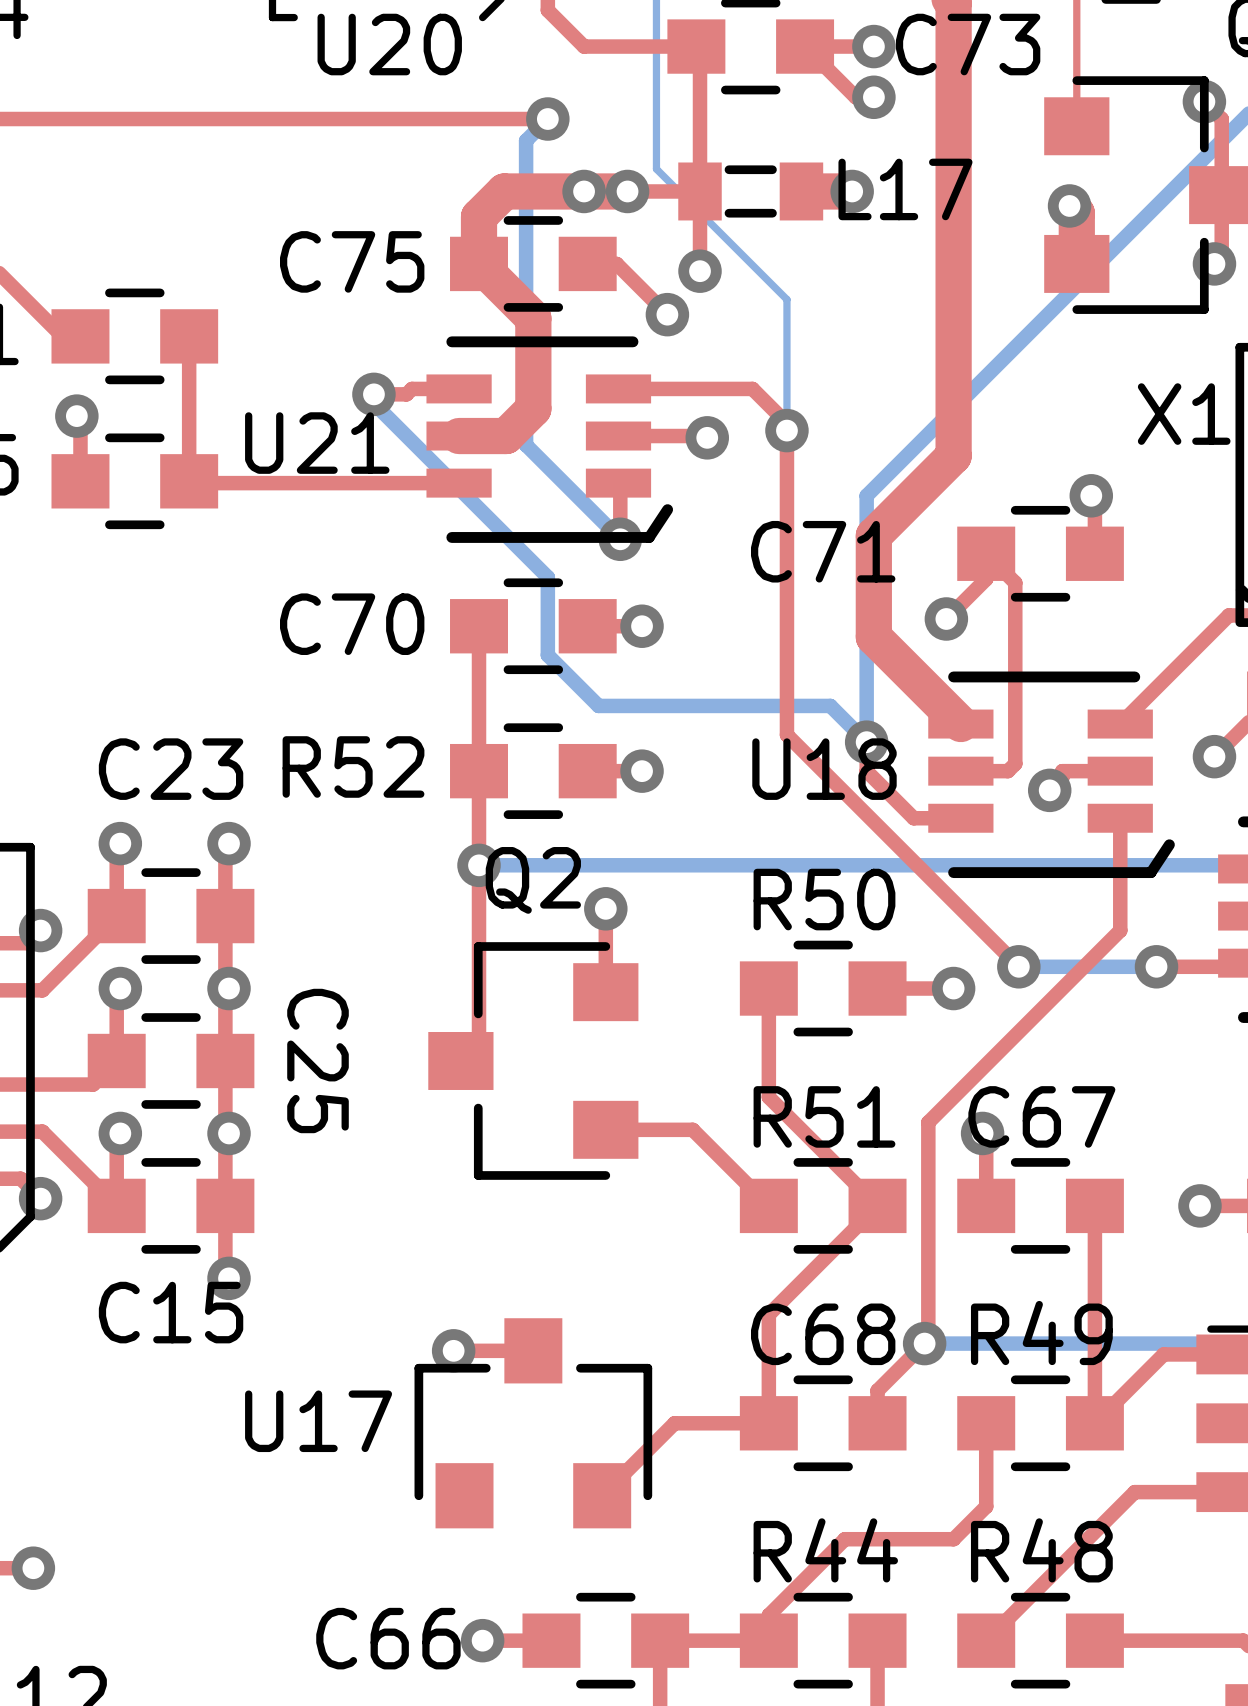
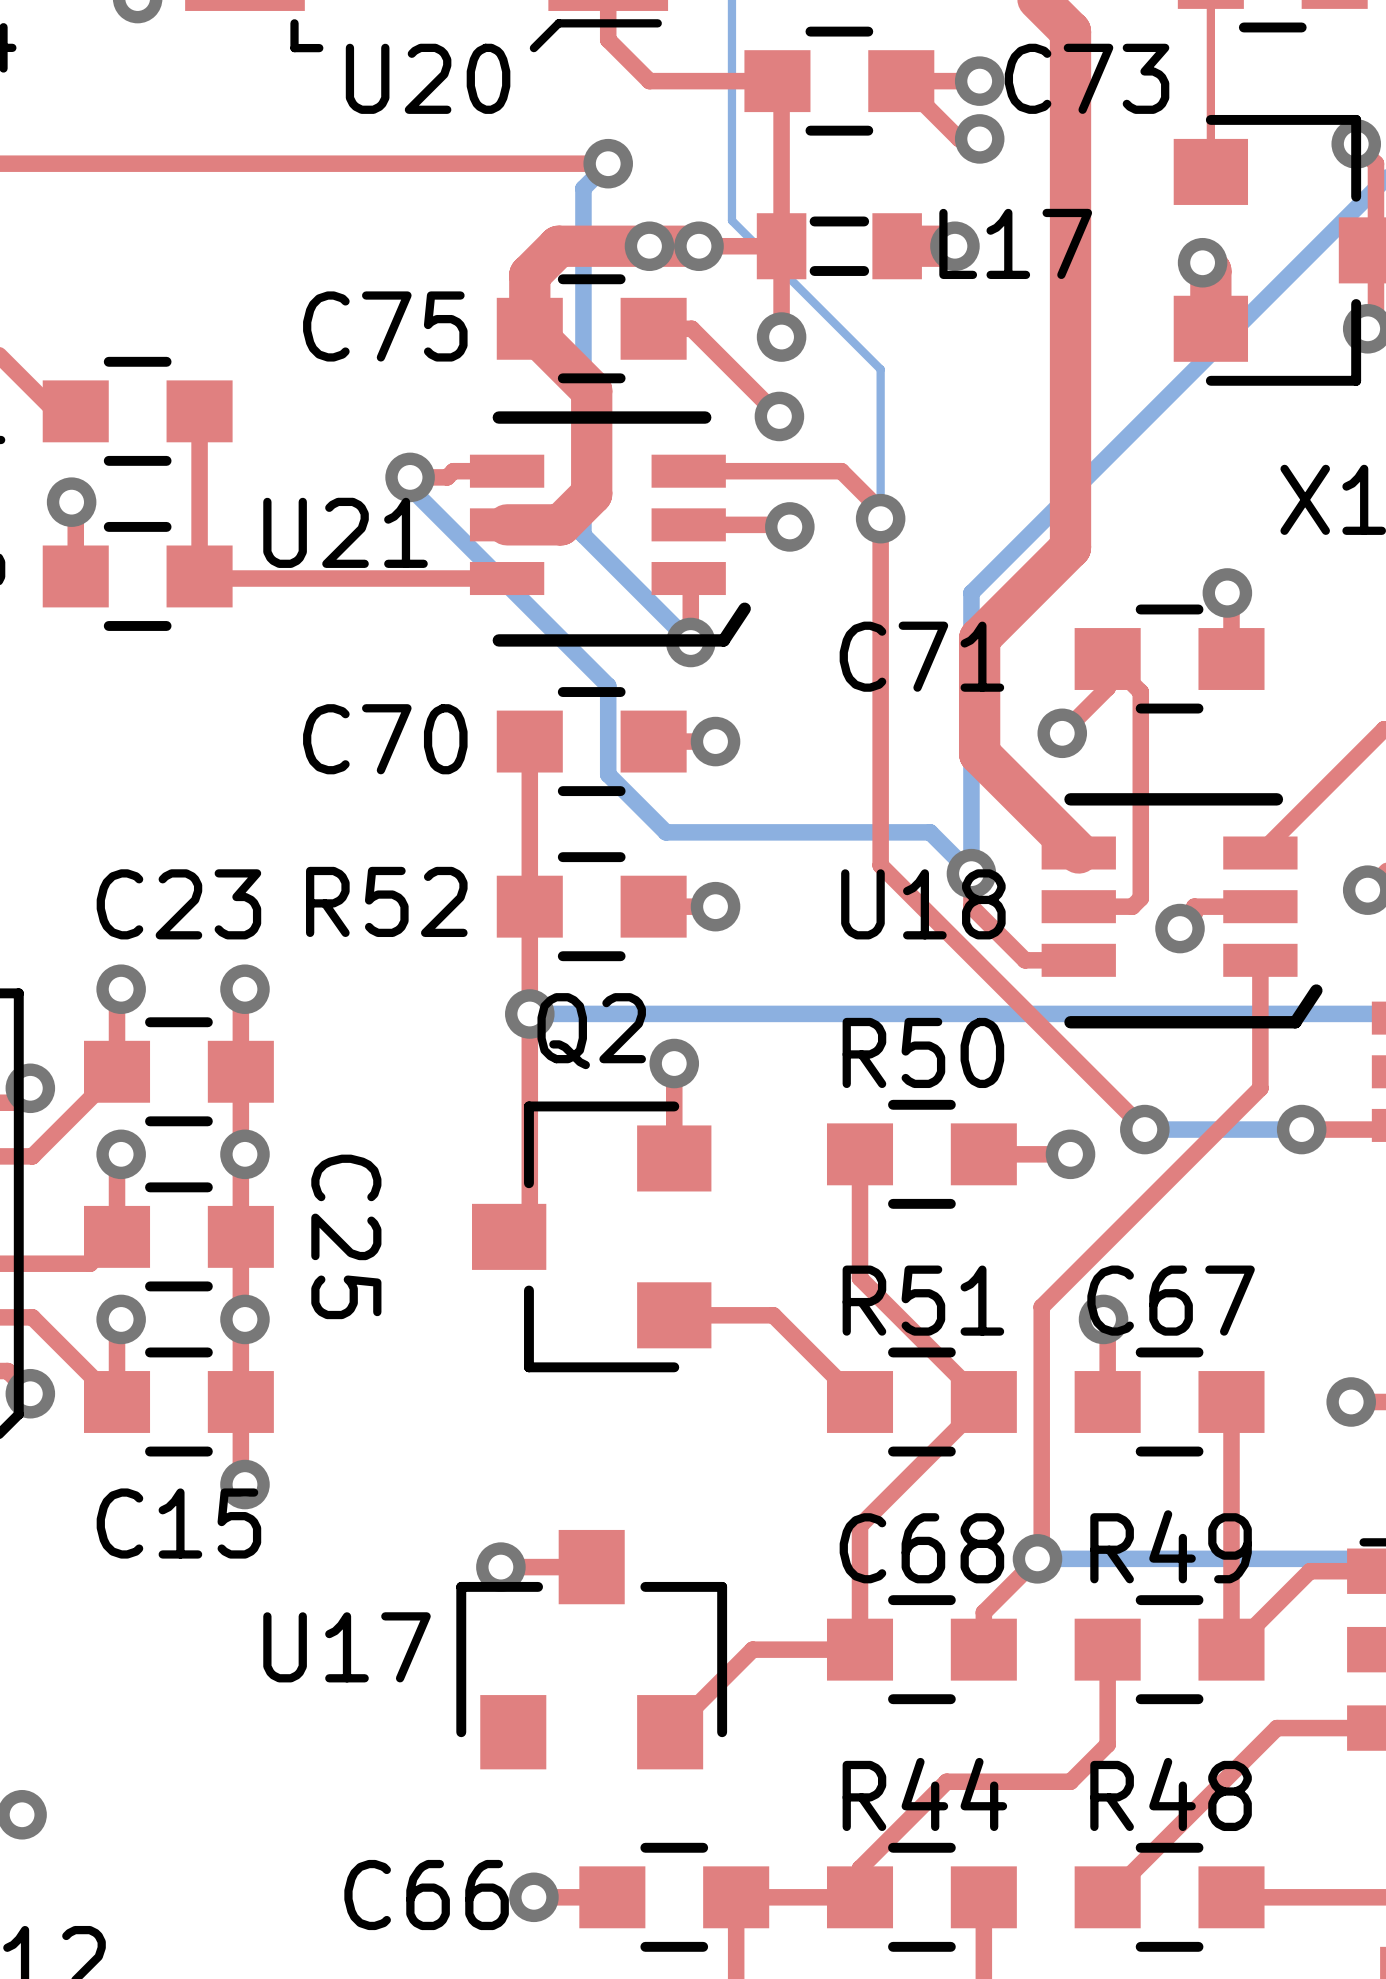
top track: (616, 263) (667, 314) -> (686, 328) (691, 328) (779, 416)
via position: (667, 314) -> (779, 416)

